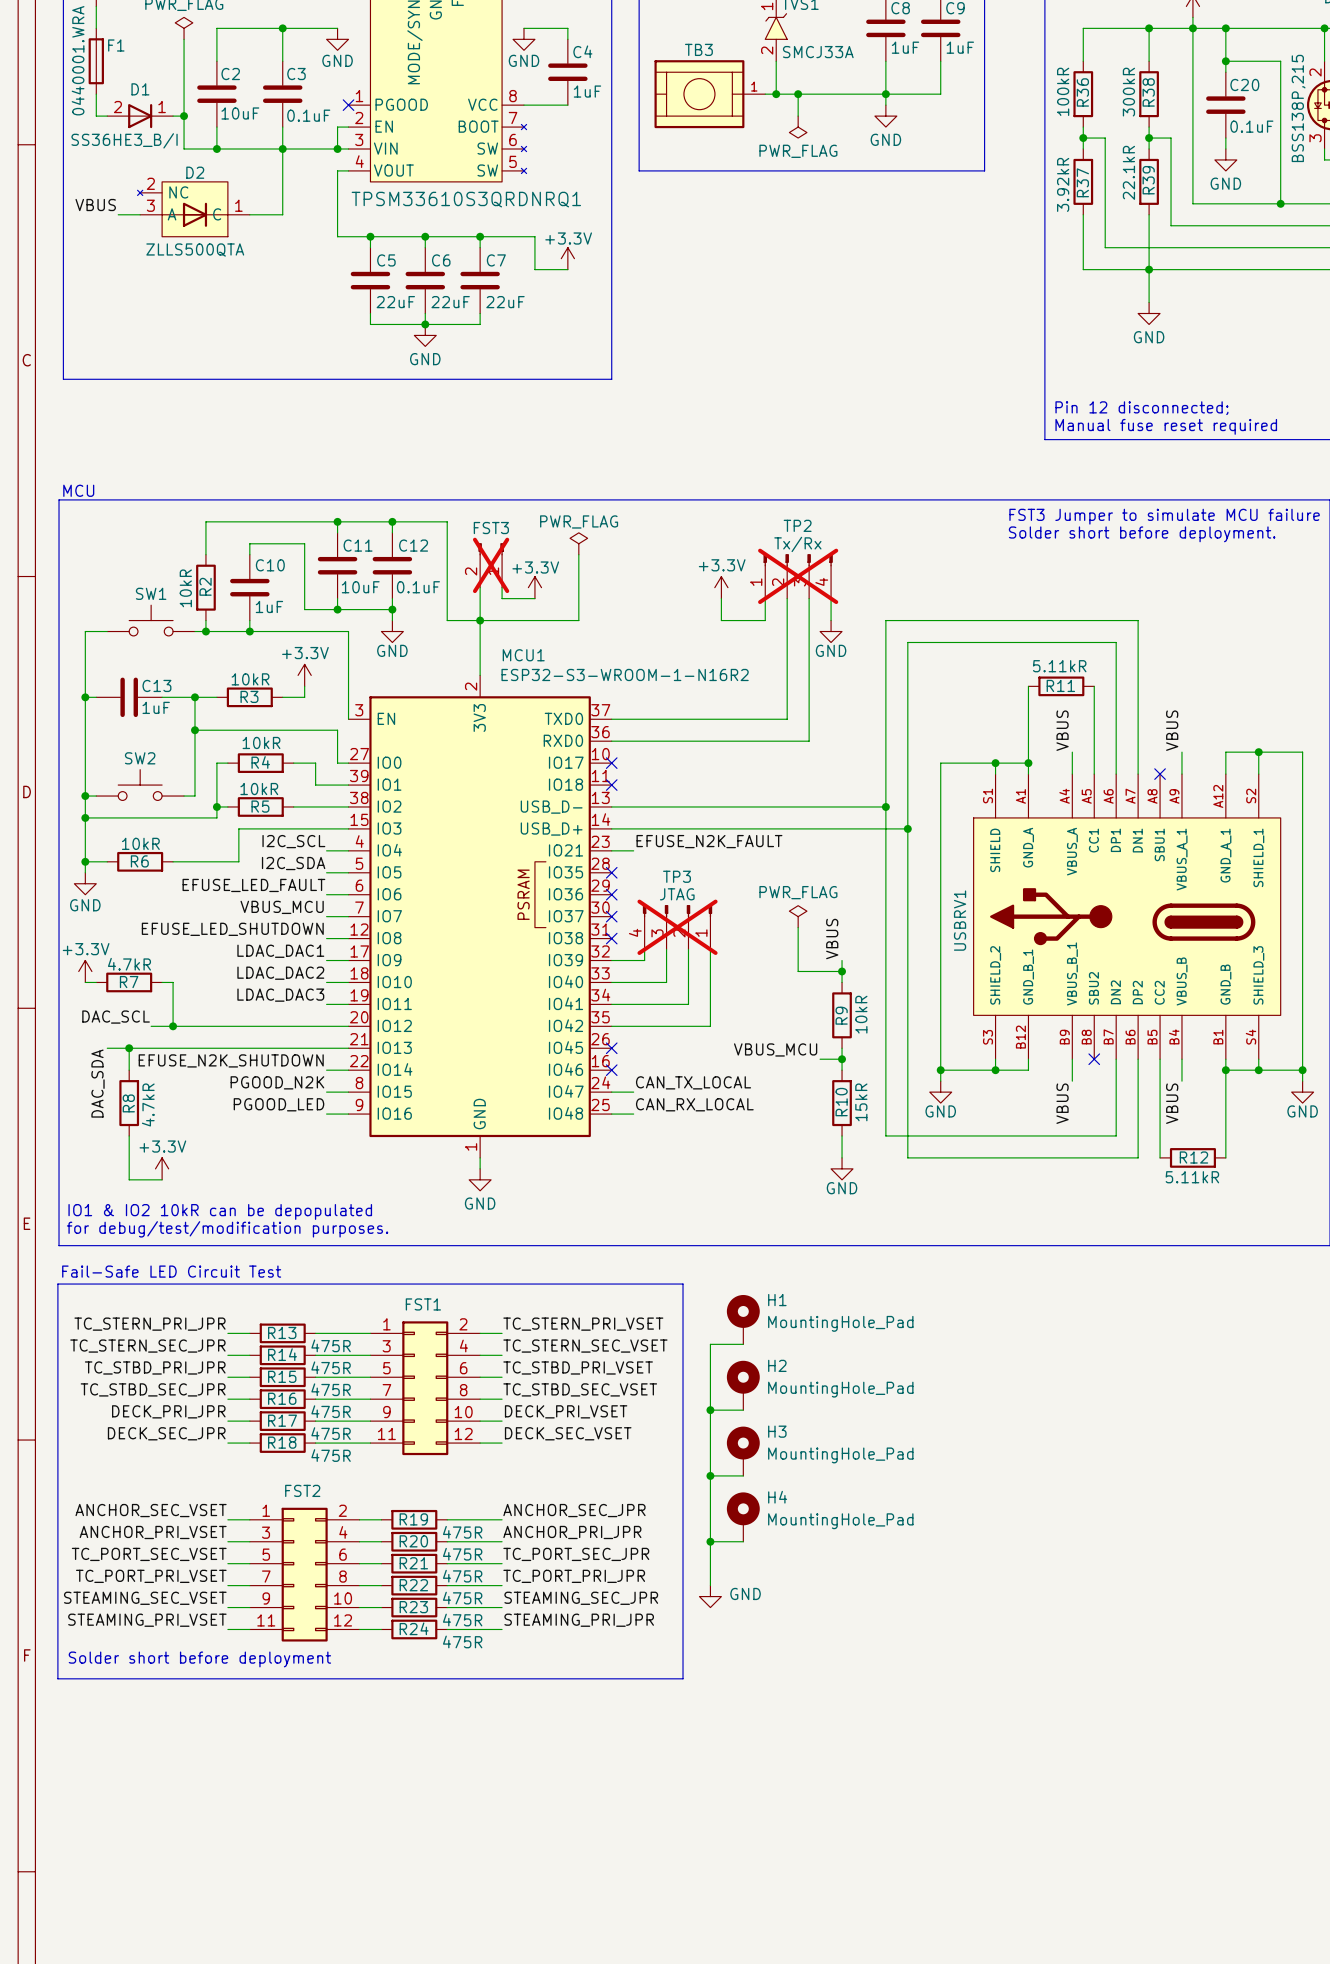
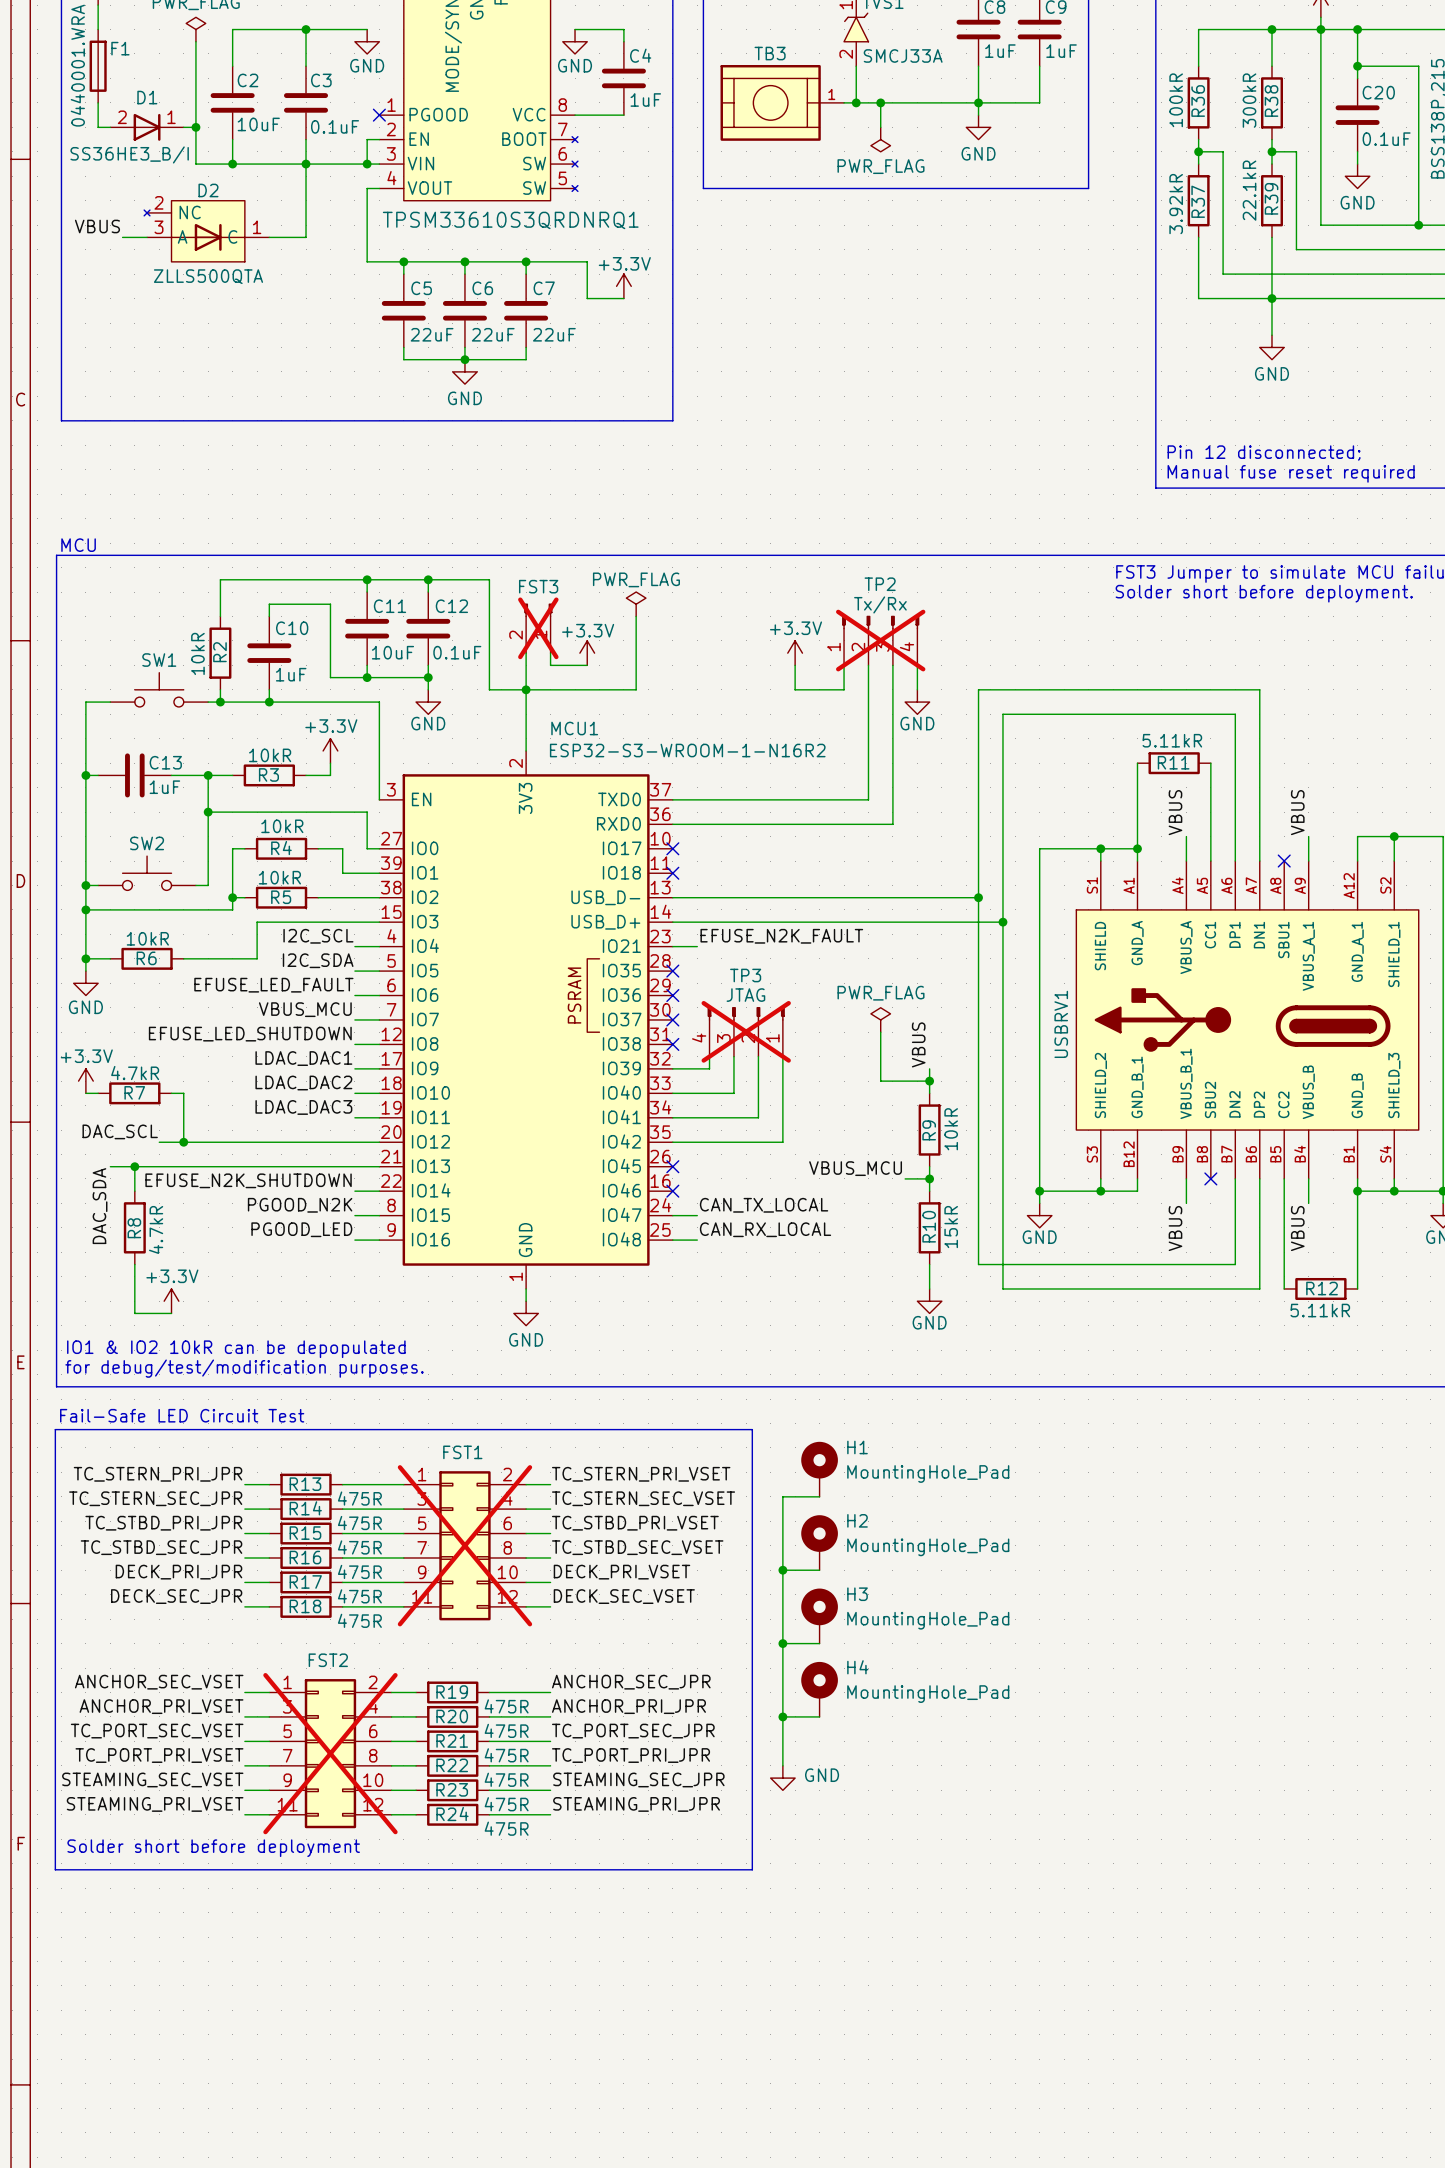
FST1 do-not-place cross: none -> (464, 1545)
FST2 do-not-place cross: none -> (330, 1753)

